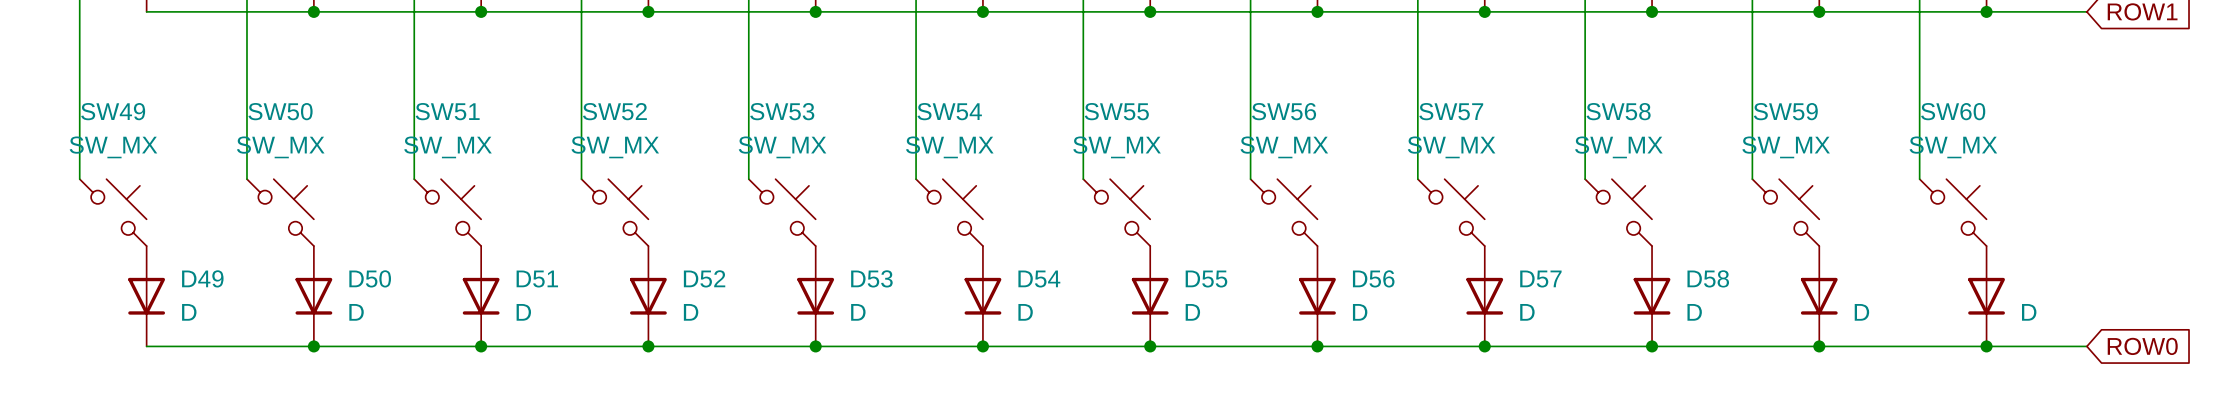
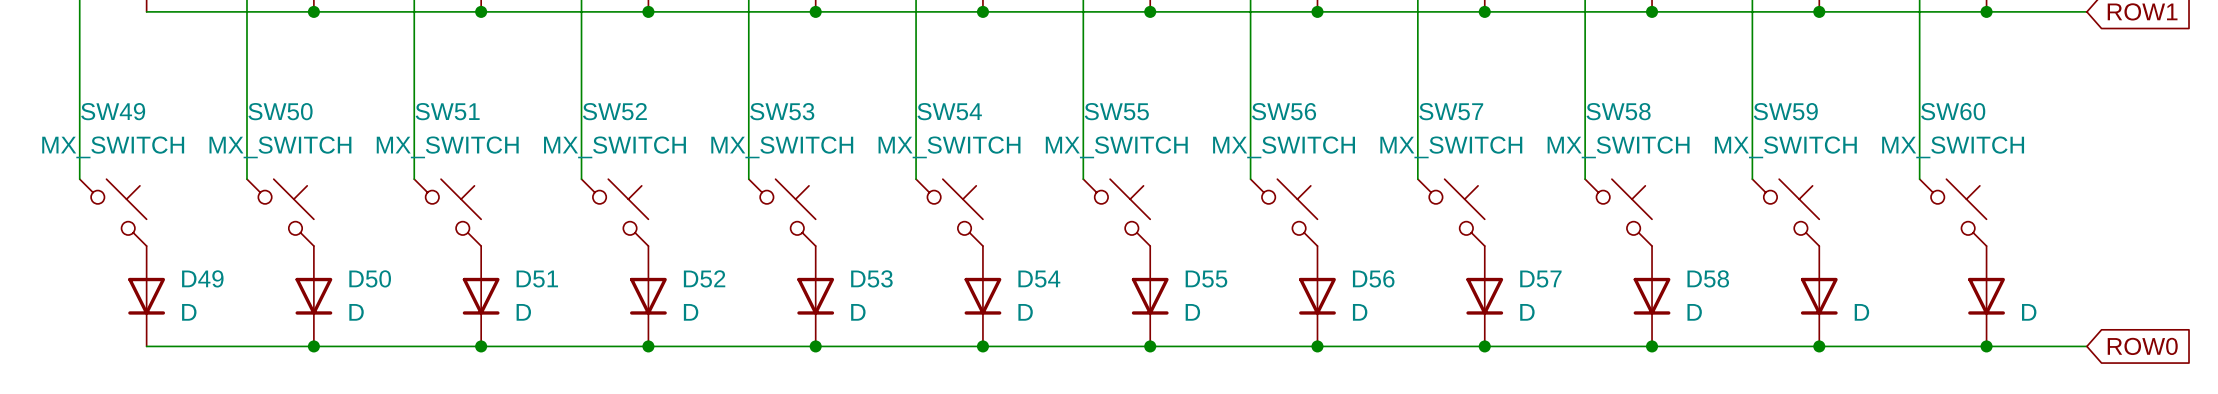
SW49 value: SW_MX (113, 147) -> MX_SWITCH (113, 147)
SW50 value: SW_MX (280, 147) -> MX_SWITCH (280, 147)
SW51 value: SW_MX (448, 147) -> MX_SWITCH (447, 147)
SW52 value: SW_MX (615, 147) -> MX_SWITCH (614, 147)
SW53 value: SW_MX (782, 147) -> MX_SWITCH (782, 147)
SW54 value: SW_MX (949, 147) -> MX_SWITCH (949, 147)
SW55 value: SW_MX (1117, 147) -> MX_SWITCH (1116, 147)
SW56 value: SW_MX (1284, 147) -> MX_SWITCH (1284, 147)
SW57 value: SW_MX (1451, 147) -> MX_SWITCH (1451, 147)
SW58 value: SW_MX (1618, 147) -> MX_SWITCH (1618, 147)
SW59 value: SW_MX (1786, 147) -> MX_SWITCH (1785, 147)
SW60 value: SW_MX (1953, 147) -> MX_SWITCH (1953, 147)

